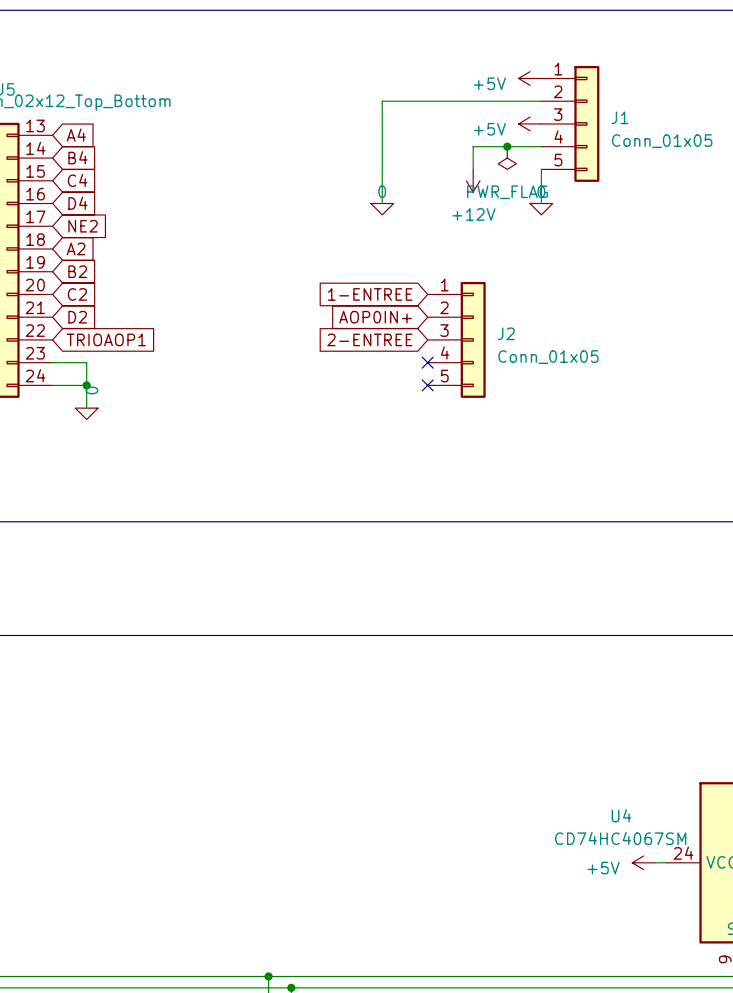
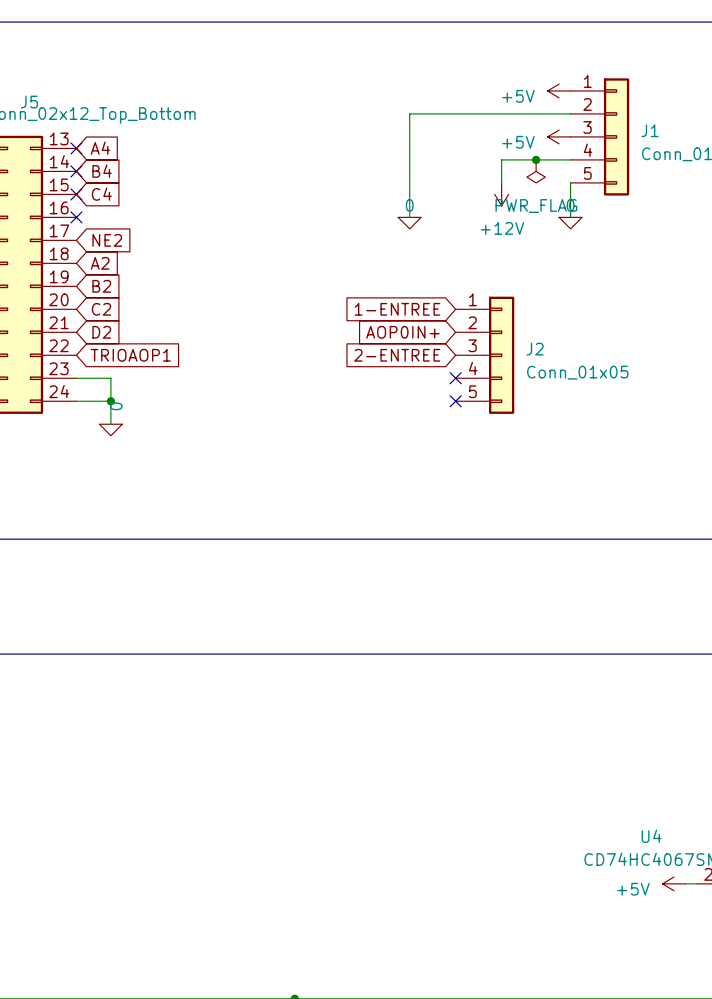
no-connect mark: none -> (76, 148)
no-connect mark: none -> (76, 171)
no-connect mark: none -> (76, 194)
no-connect mark: none -> (76, 217)
global label: D4 (77, 203) -> none

